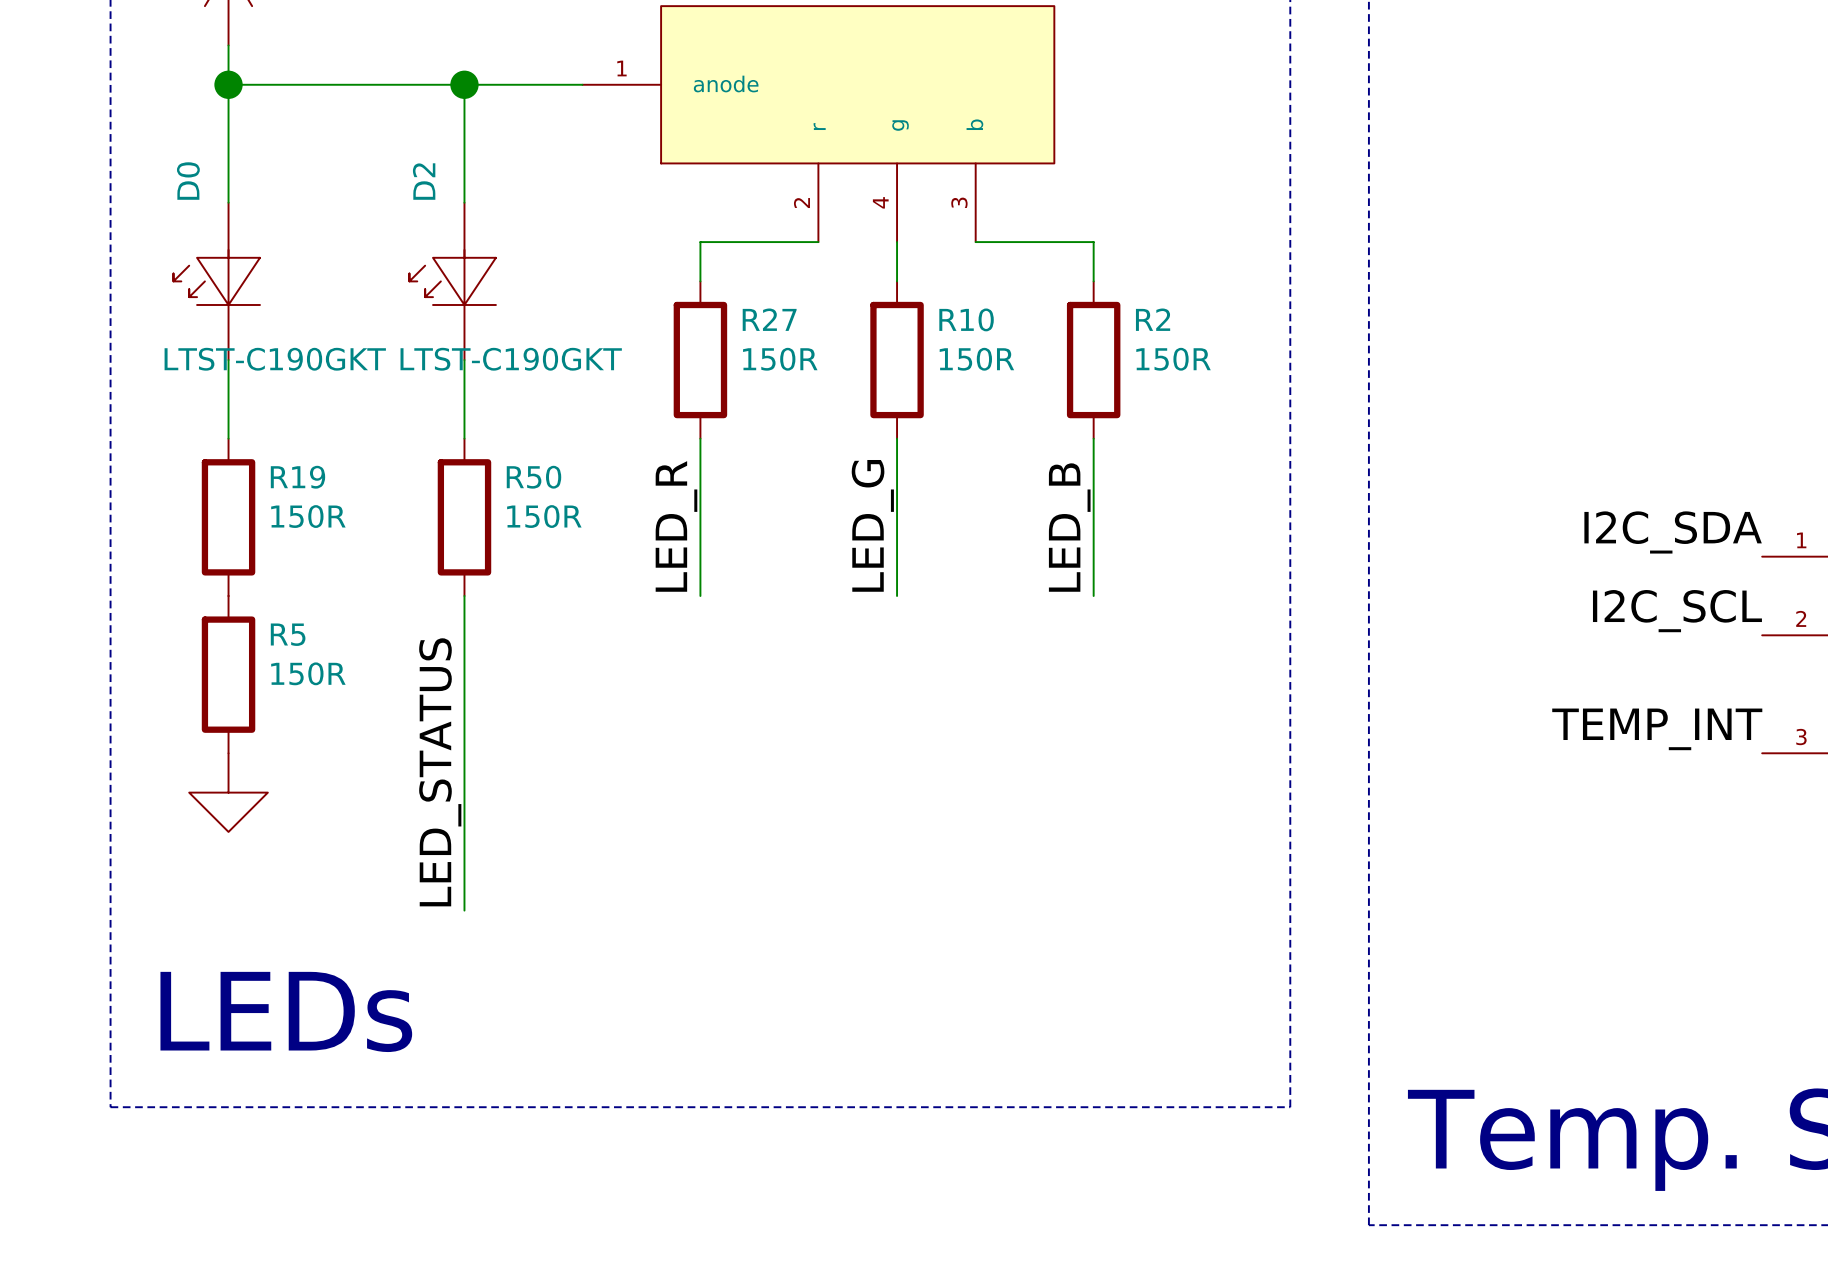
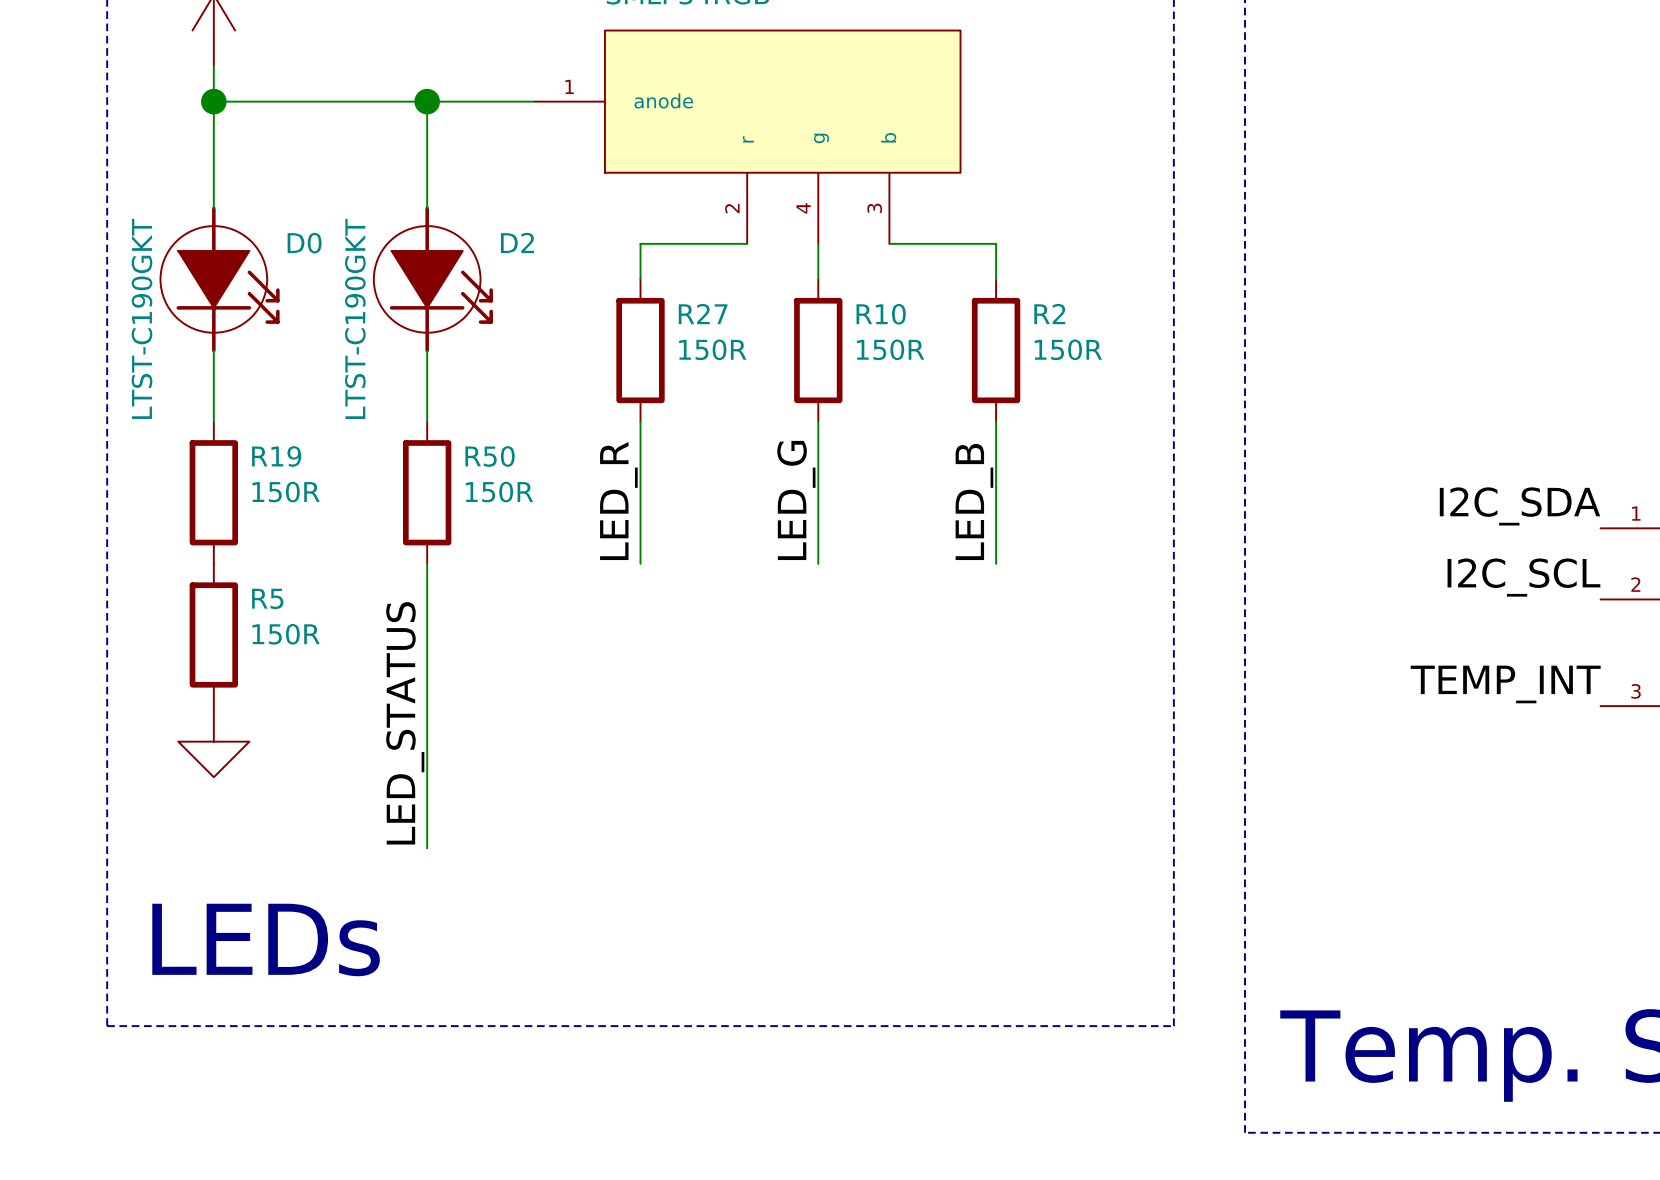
D0 name position: D0 (188, 181) -> D0 (304, 243)
D2 name position: D2 (424, 181) -> D2 (517, 242)
D0 symbol: [173, 202, 260, 361] -> [160, 206, 280, 353]
D2 symbol: [409, 202, 496, 361] -> [373, 206, 493, 353]
D0 value position: LTST-C190GKT (275, 359) -> LTST-C190GKT (141, 318)
D2 value position: LTST-C190GKT (511, 359) -> LTST-C190GKT (355, 318)

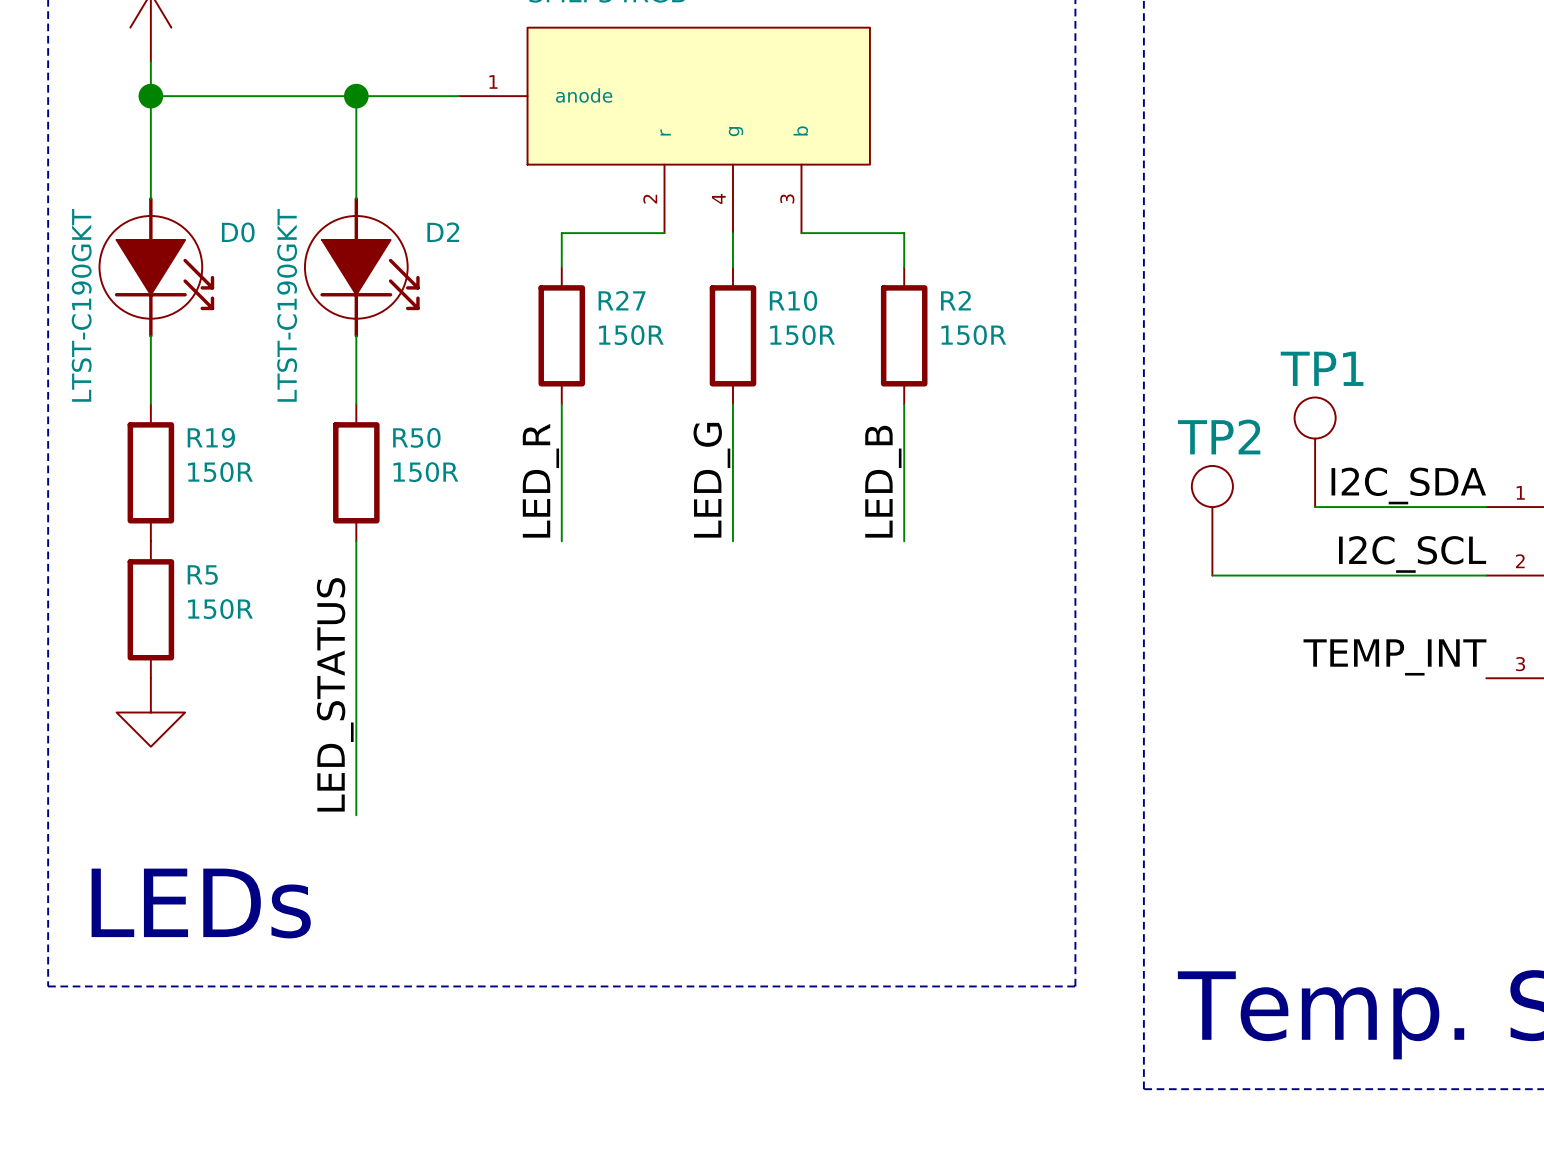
TP1: none -> (1315, 452)
wire: none -> (1315, 507) (1486, 507)
TP2: none -> (1212, 520)
wire: none -> (1212, 575) (1486, 575)

